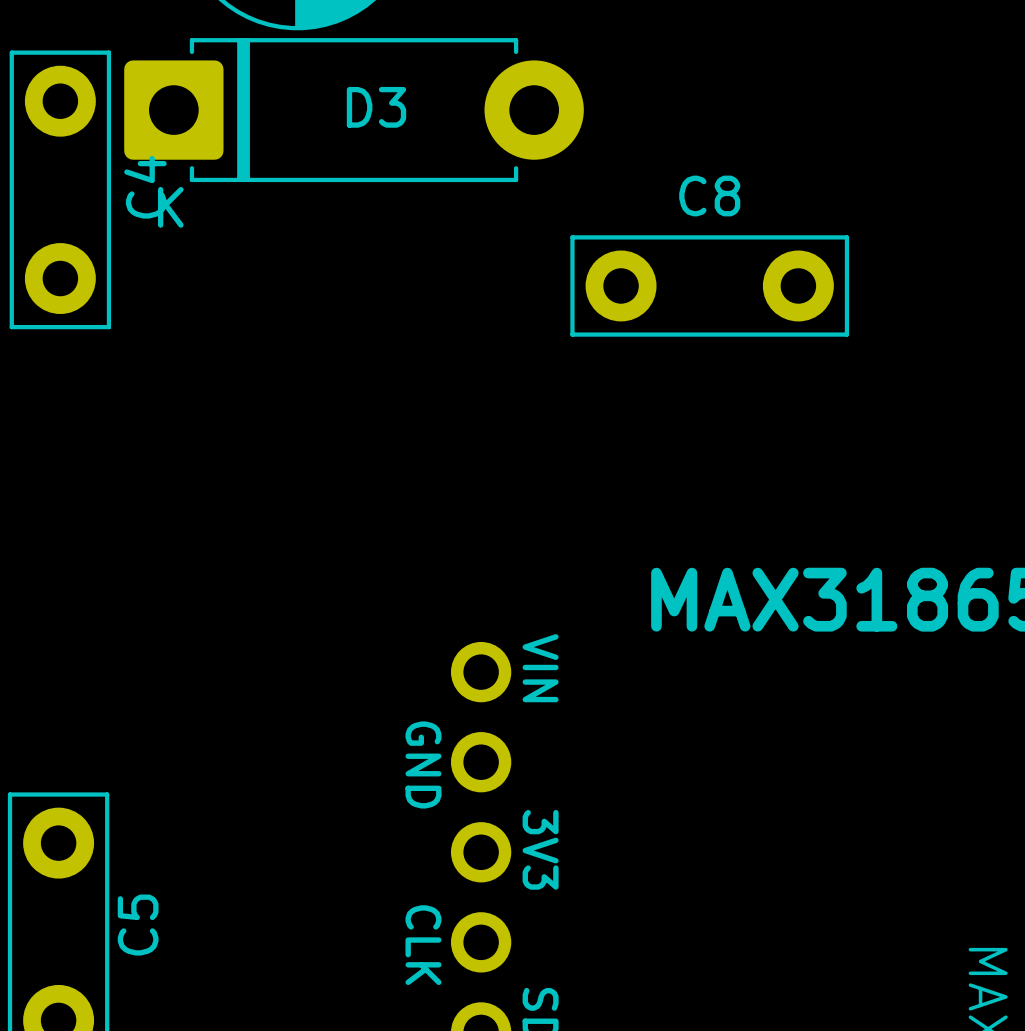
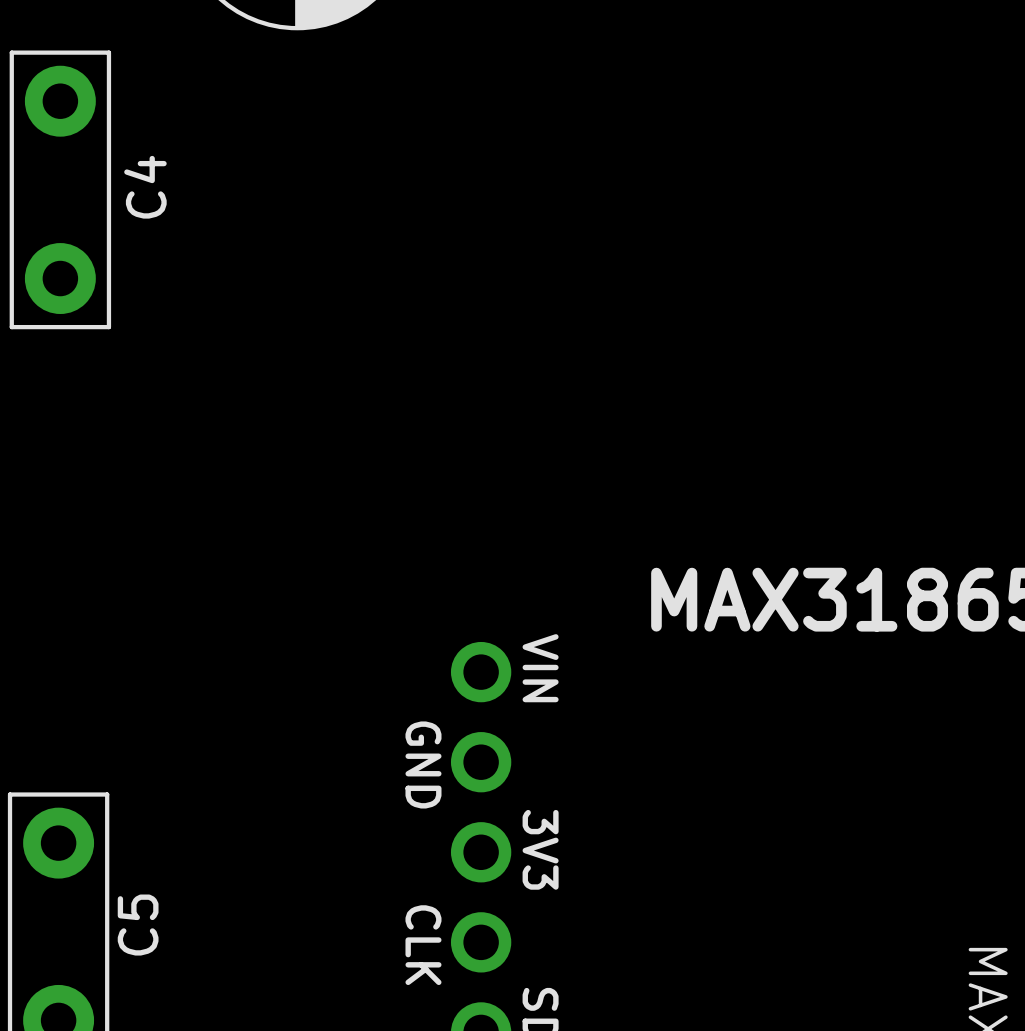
D3: (354, 110) -> none
C8: (709, 285) -> none

